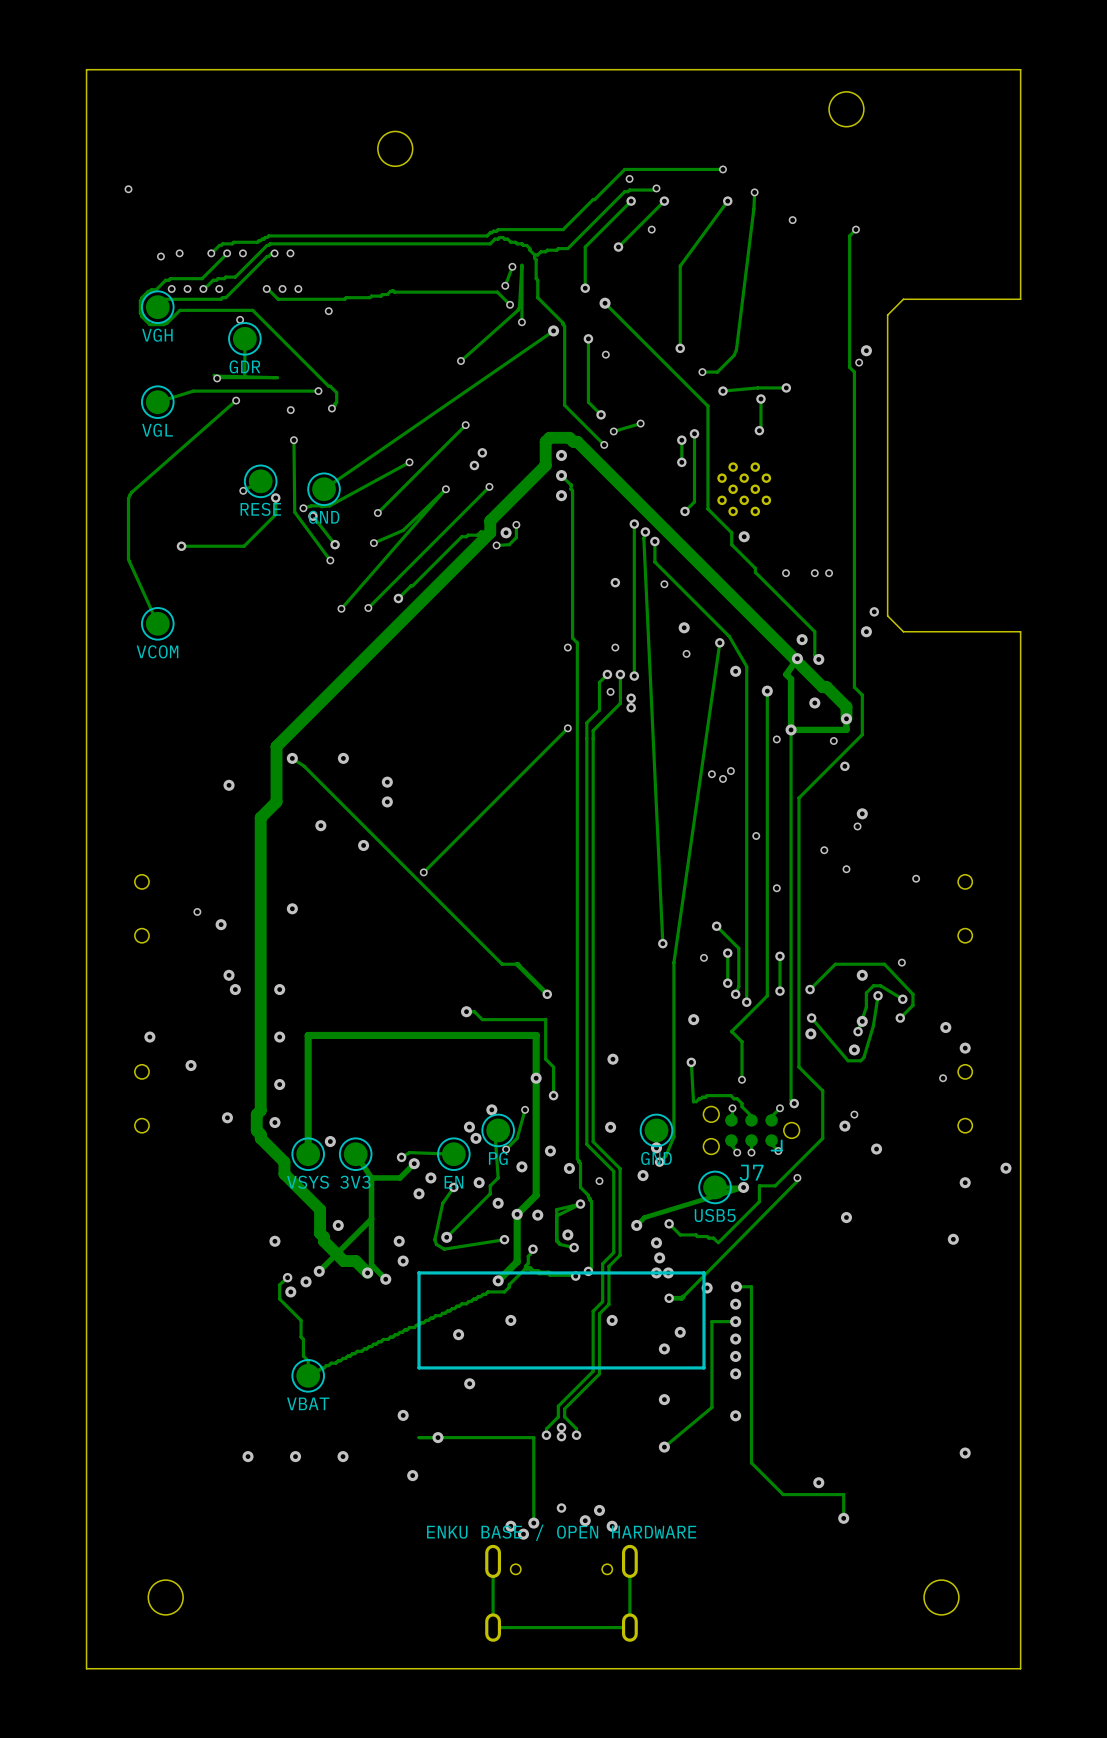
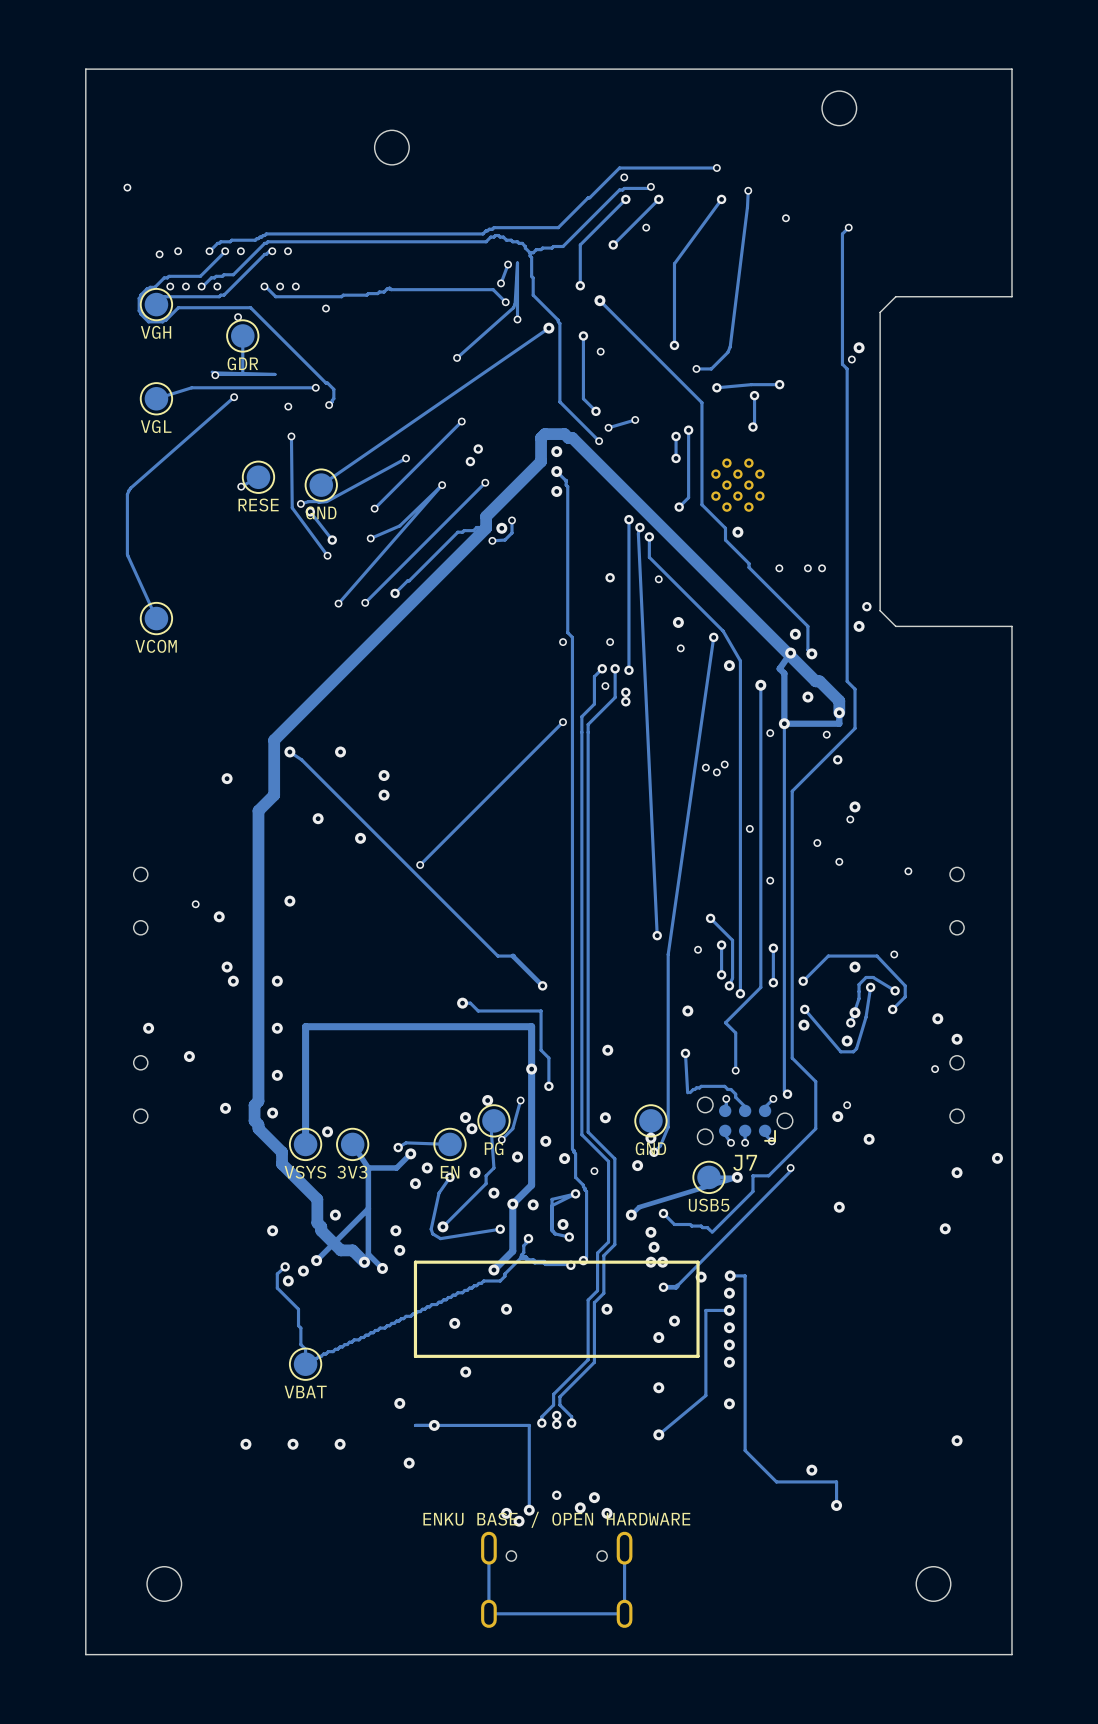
track: (275, 497) (275, 514) (244, 546) (181, 546) -> none
via: (275, 497) -> none
via: (181, 546) -> none

